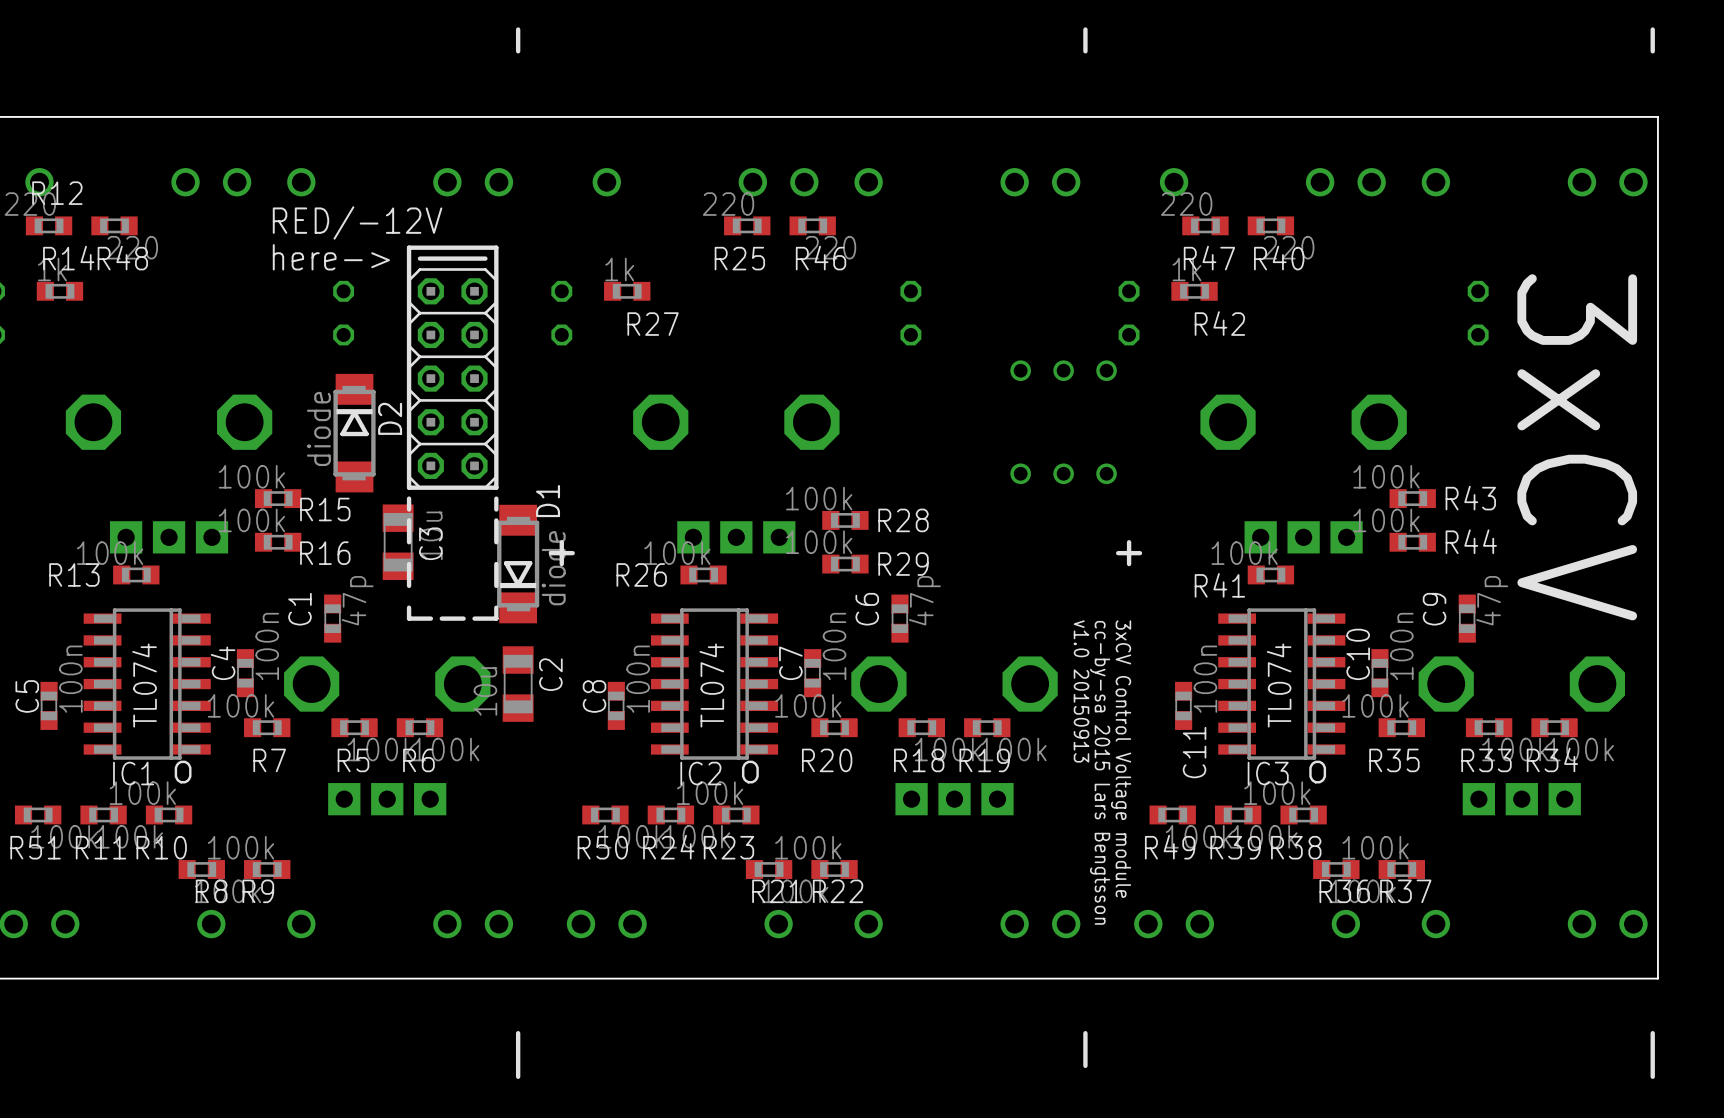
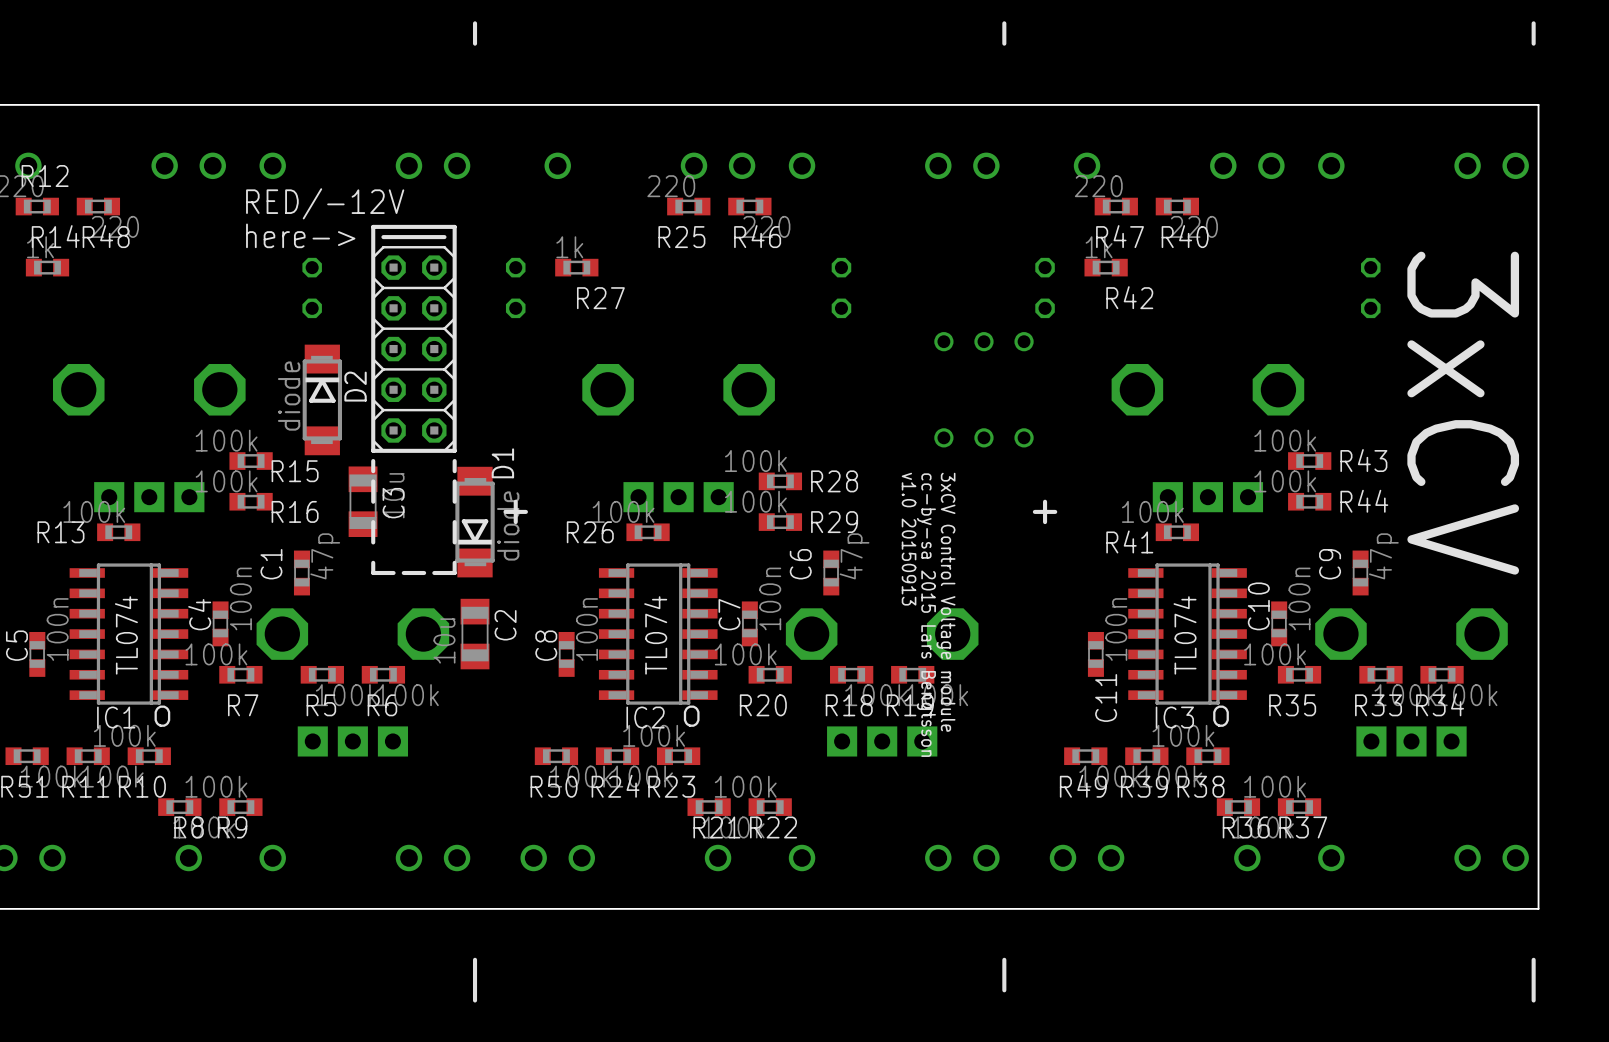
text position: v1.0 20150913 (1081, 691) -> v1.0 20150913 (909, 539)
text position: 3xCV Control Voltage module (1121, 759) -> 3xCV Control Voltage module (945, 602)
text position: cc-by-sa 2015 Lars Bengtsson (1100, 772) -> cc-by-sa 2015 Lars Bengtsson (926, 615)

